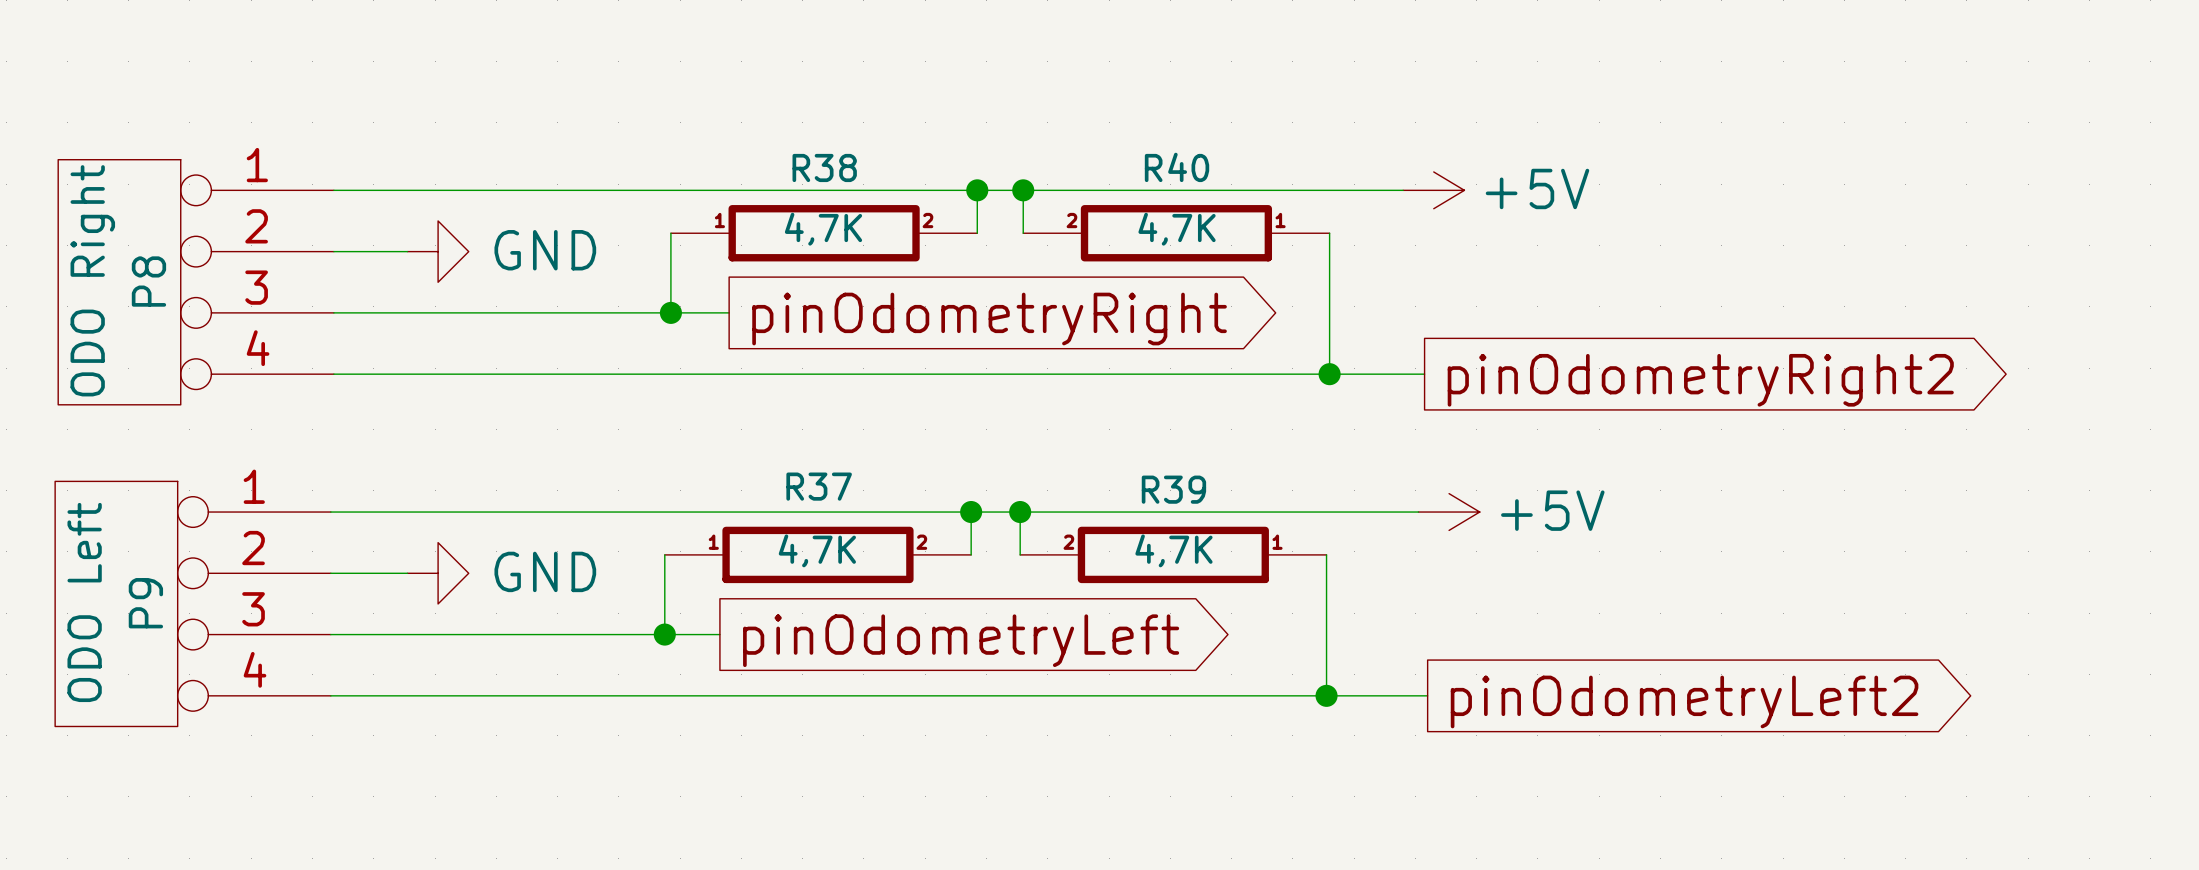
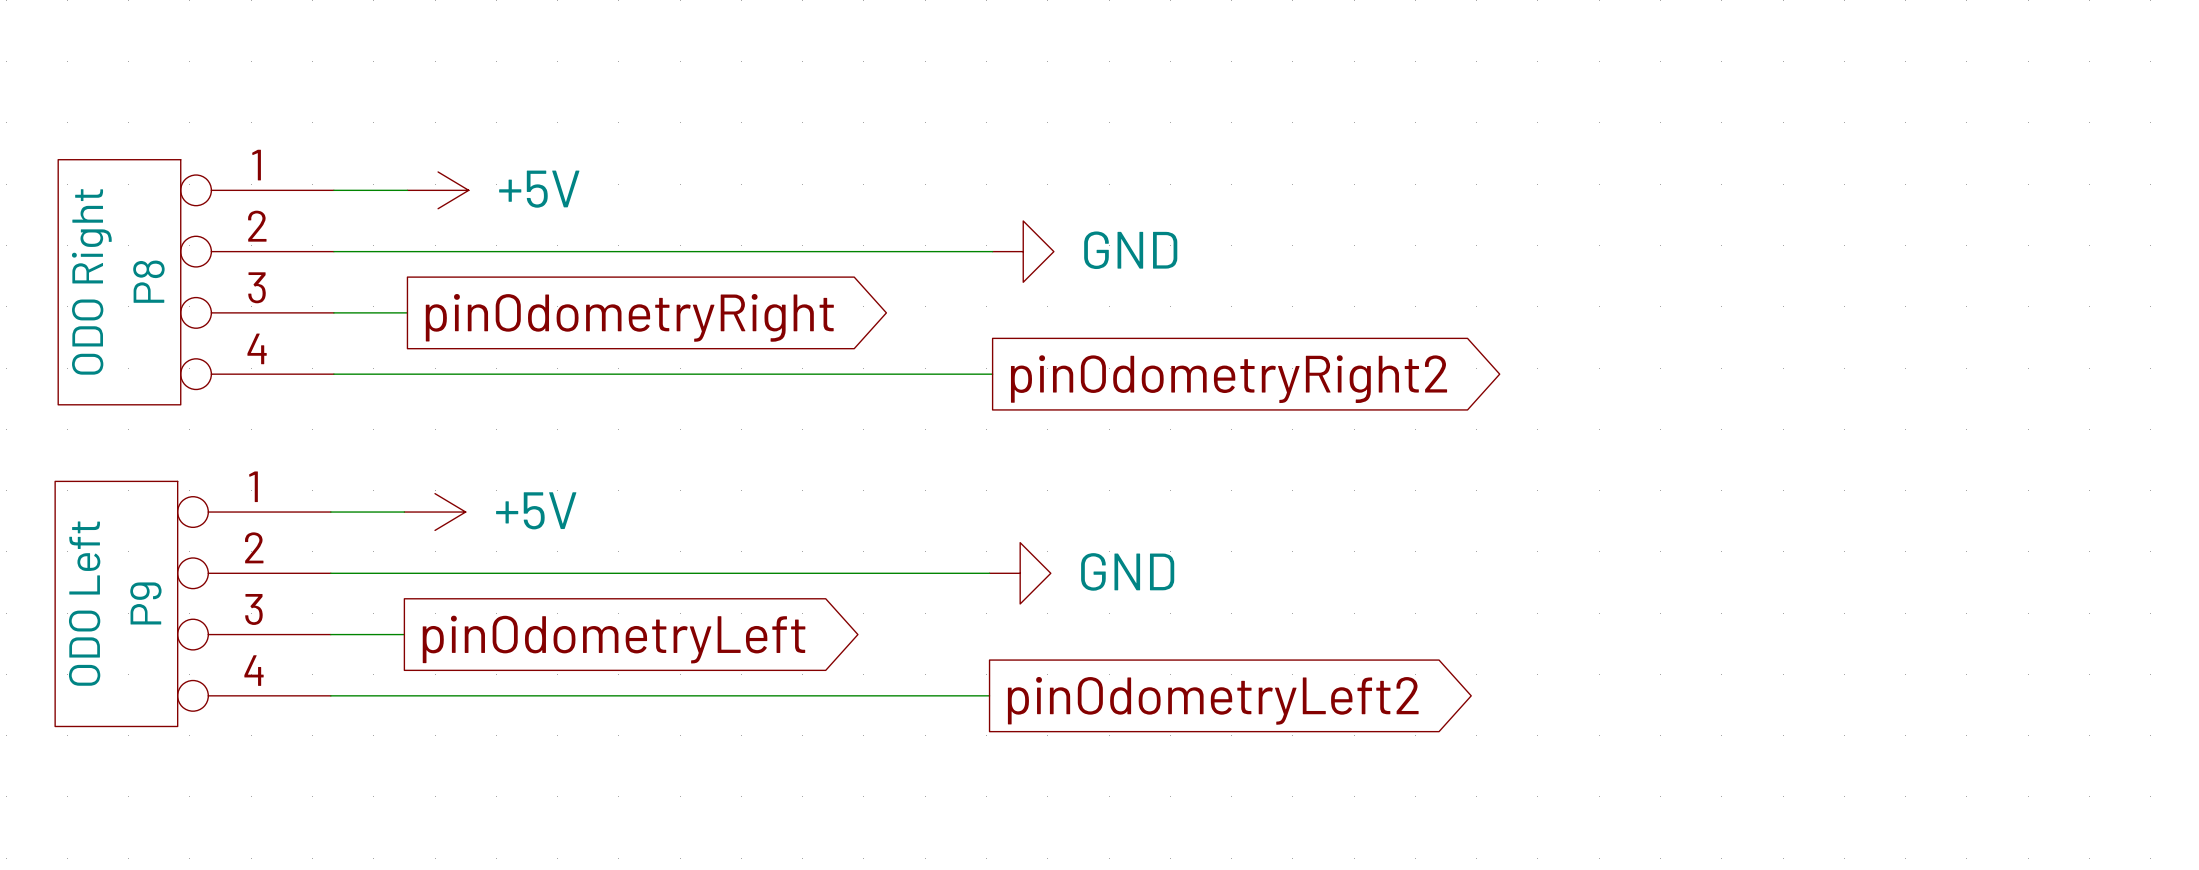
wire: (407, 190) (1403, 190) -> none
power symbol: none -> +5V (438, 190)
wire: (977, 190) (977, 233) -> none
junction: (977, 190) -> none
wire: (1023, 190) (1023, 233) -> none
junction: (1023, 190) -> none
power symbol: +5V (1433, 190) -> none
wire: (670, 233) (670, 312) -> none
R38: 4,7K (824, 233) -> none
R40: 4,7K (1176, 233) -> none
wire: (1329, 233) (1329, 374) -> none
wire: none -> (407, 251) (992, 251)
power symbol: GND (438, 251) -> none
power symbol: none -> GND (1023, 251)
wire: (407, 312) (729, 312) -> none
junction: (670, 312) -> none
global label position: pinOdometryRight (989, 319) -> pinOdometryRight (629, 317)
wire: (992, 374) (1424, 374) -> none
junction: (1329, 374) -> none
global label position: pinOdometryRight2 (1700, 380) -> pinOdometryRight2 (1229, 379)
wire: (404, 512) (1418, 512) -> none
power symbol: none -> +5V (435, 512)
wire: (971, 512) (971, 554) -> none
junction: (971, 512) -> none
wire: (1020, 512) (1020, 554) -> none
junction: (1020, 512) -> none
power symbol: +5V (1449, 512) -> none
wire: (664, 554) (664, 634) -> none
R37: 4,7K (817, 554) -> none
R39: 4,7K (1173, 554) -> none
wire: (1326, 554) (1326, 695) -> none
wire: none -> (407, 573) (989, 573)
power symbol: GND (438, 573) -> none
power symbol: none -> GND (1020, 573)
wire: (404, 634) (719, 634) -> none
junction: (664, 634) -> none
global label position: pinOdometryLeft (961, 640) -> pinOdometryLeft (614, 639)
wire: (989, 695) (1427, 695) -> none
junction: (1326, 695) -> none
global label position: pinOdometryLeft2 (1684, 701) -> pinOdometryLeft2 (1213, 700)

